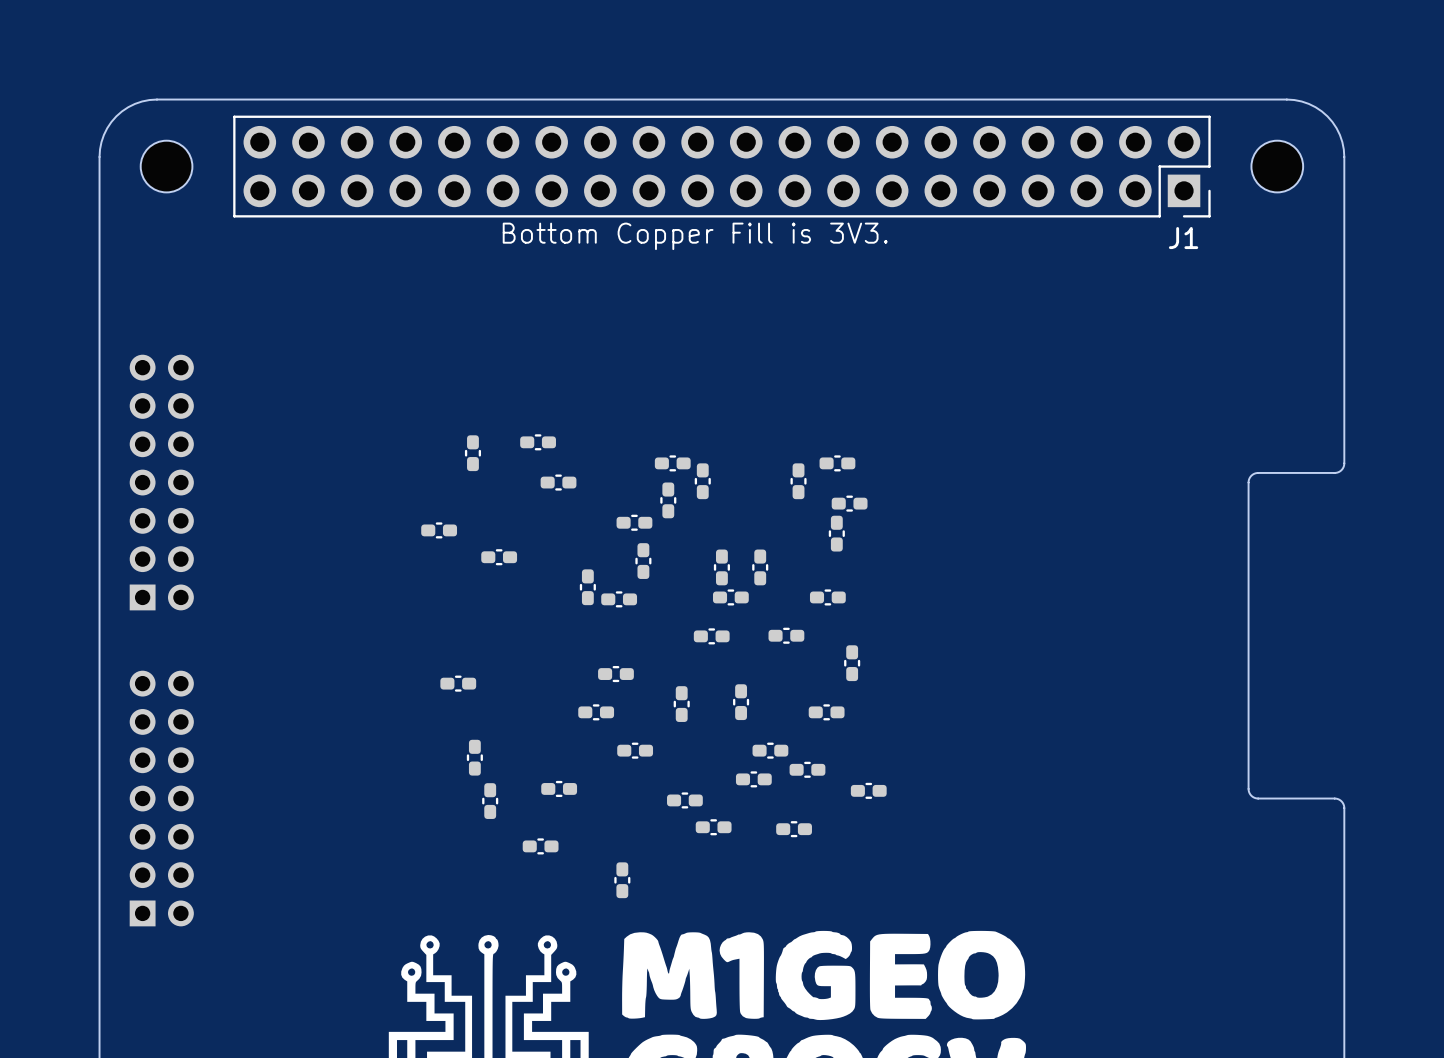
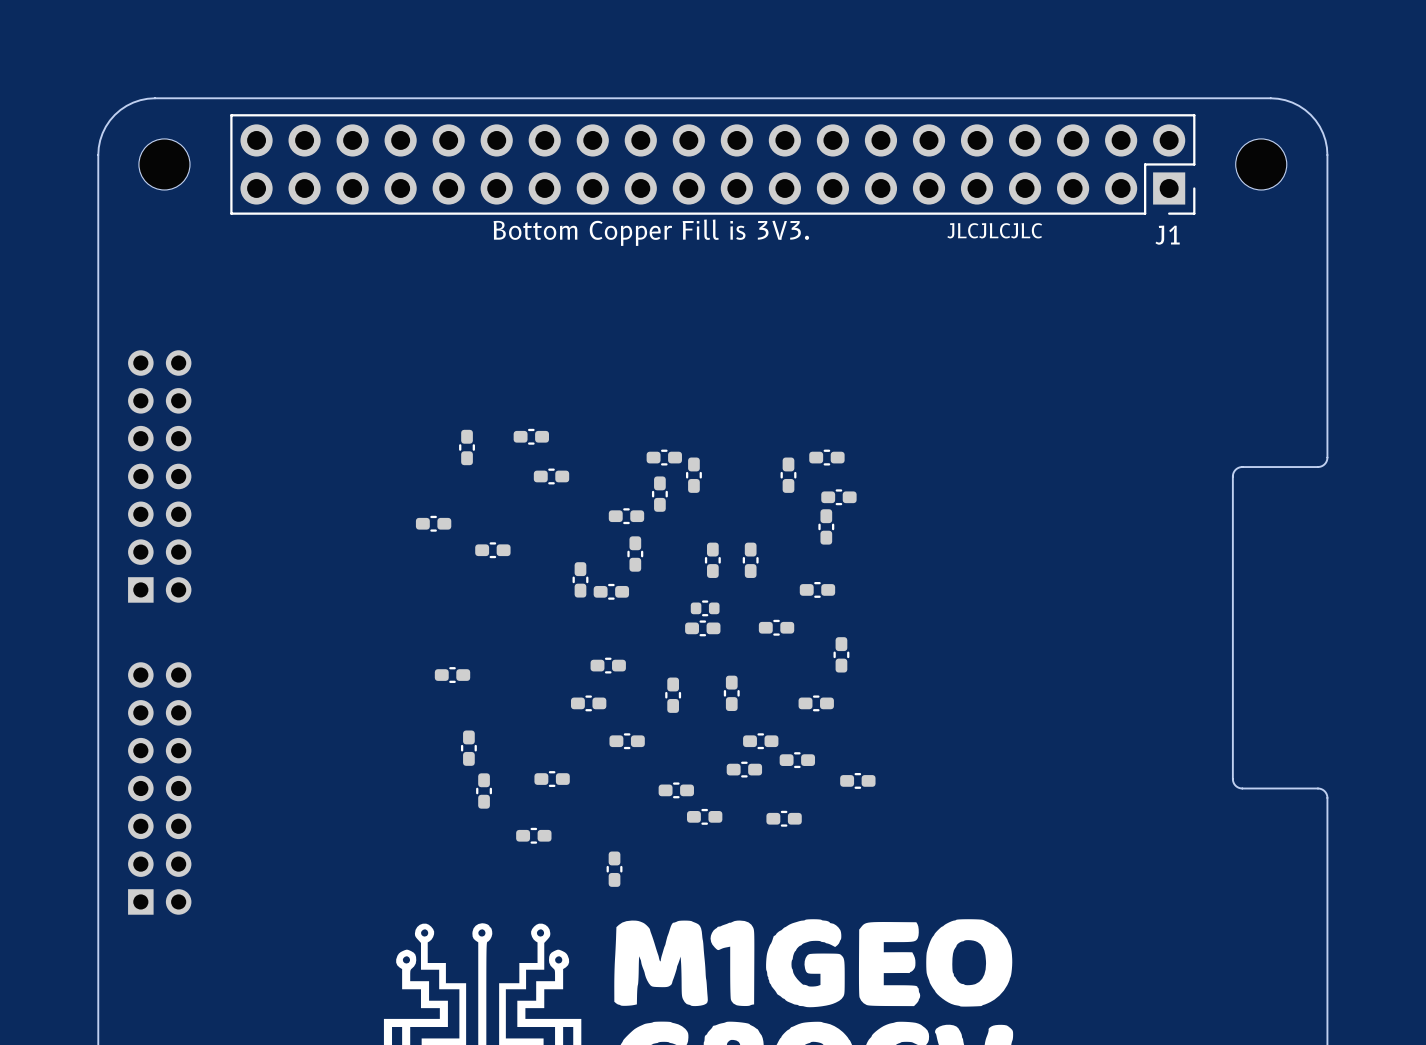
text: none -> JLCJLCJLC (994, 230)
part: (730, 597) -> none
part: none -> (705, 608)

